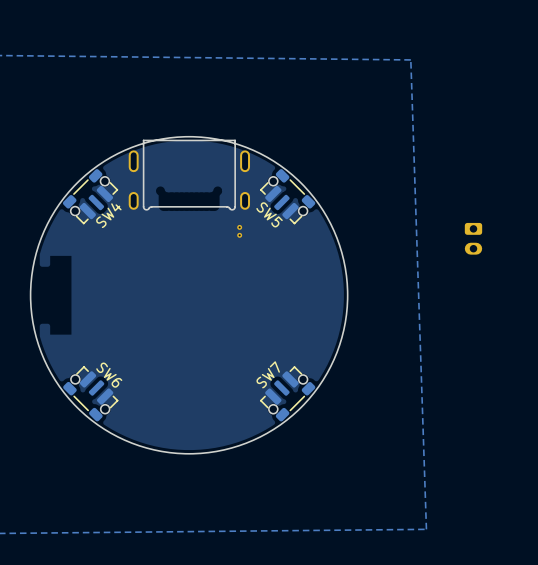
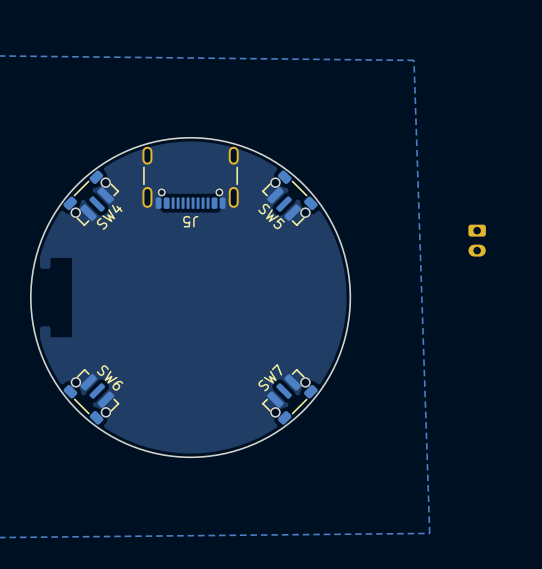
part: (189, 175) -> none
J5: none -> (190, 177)
part: (239, 231) -> none

